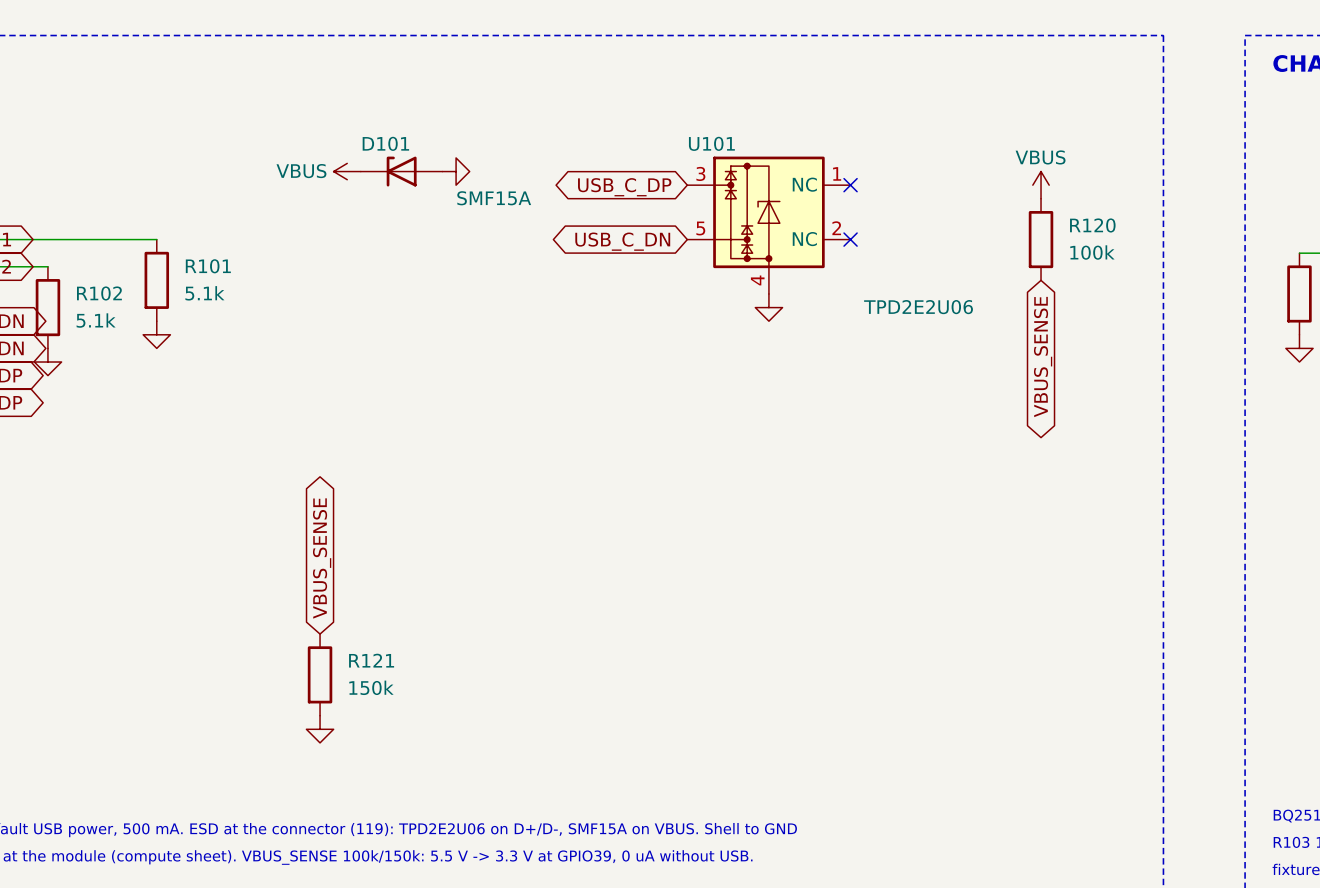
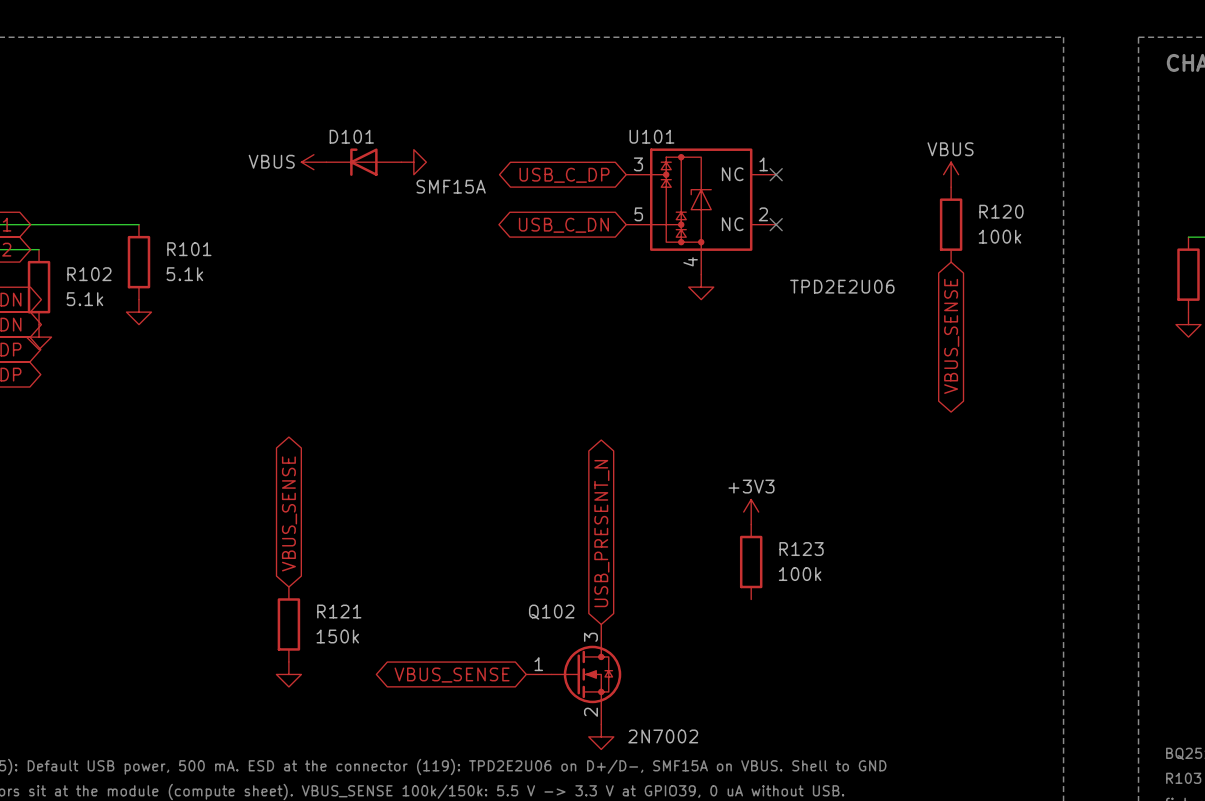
power symbol: none -> +3V3 (751, 512)
global label: none -> USB_PRESENT_N (601, 533)
R123: none -> 100k (751, 562)
Q102: none -> 2N7002 (573, 674)
global label: none -> VBUS_SENSE (452, 675)
power symbol: none -> (601, 736)

